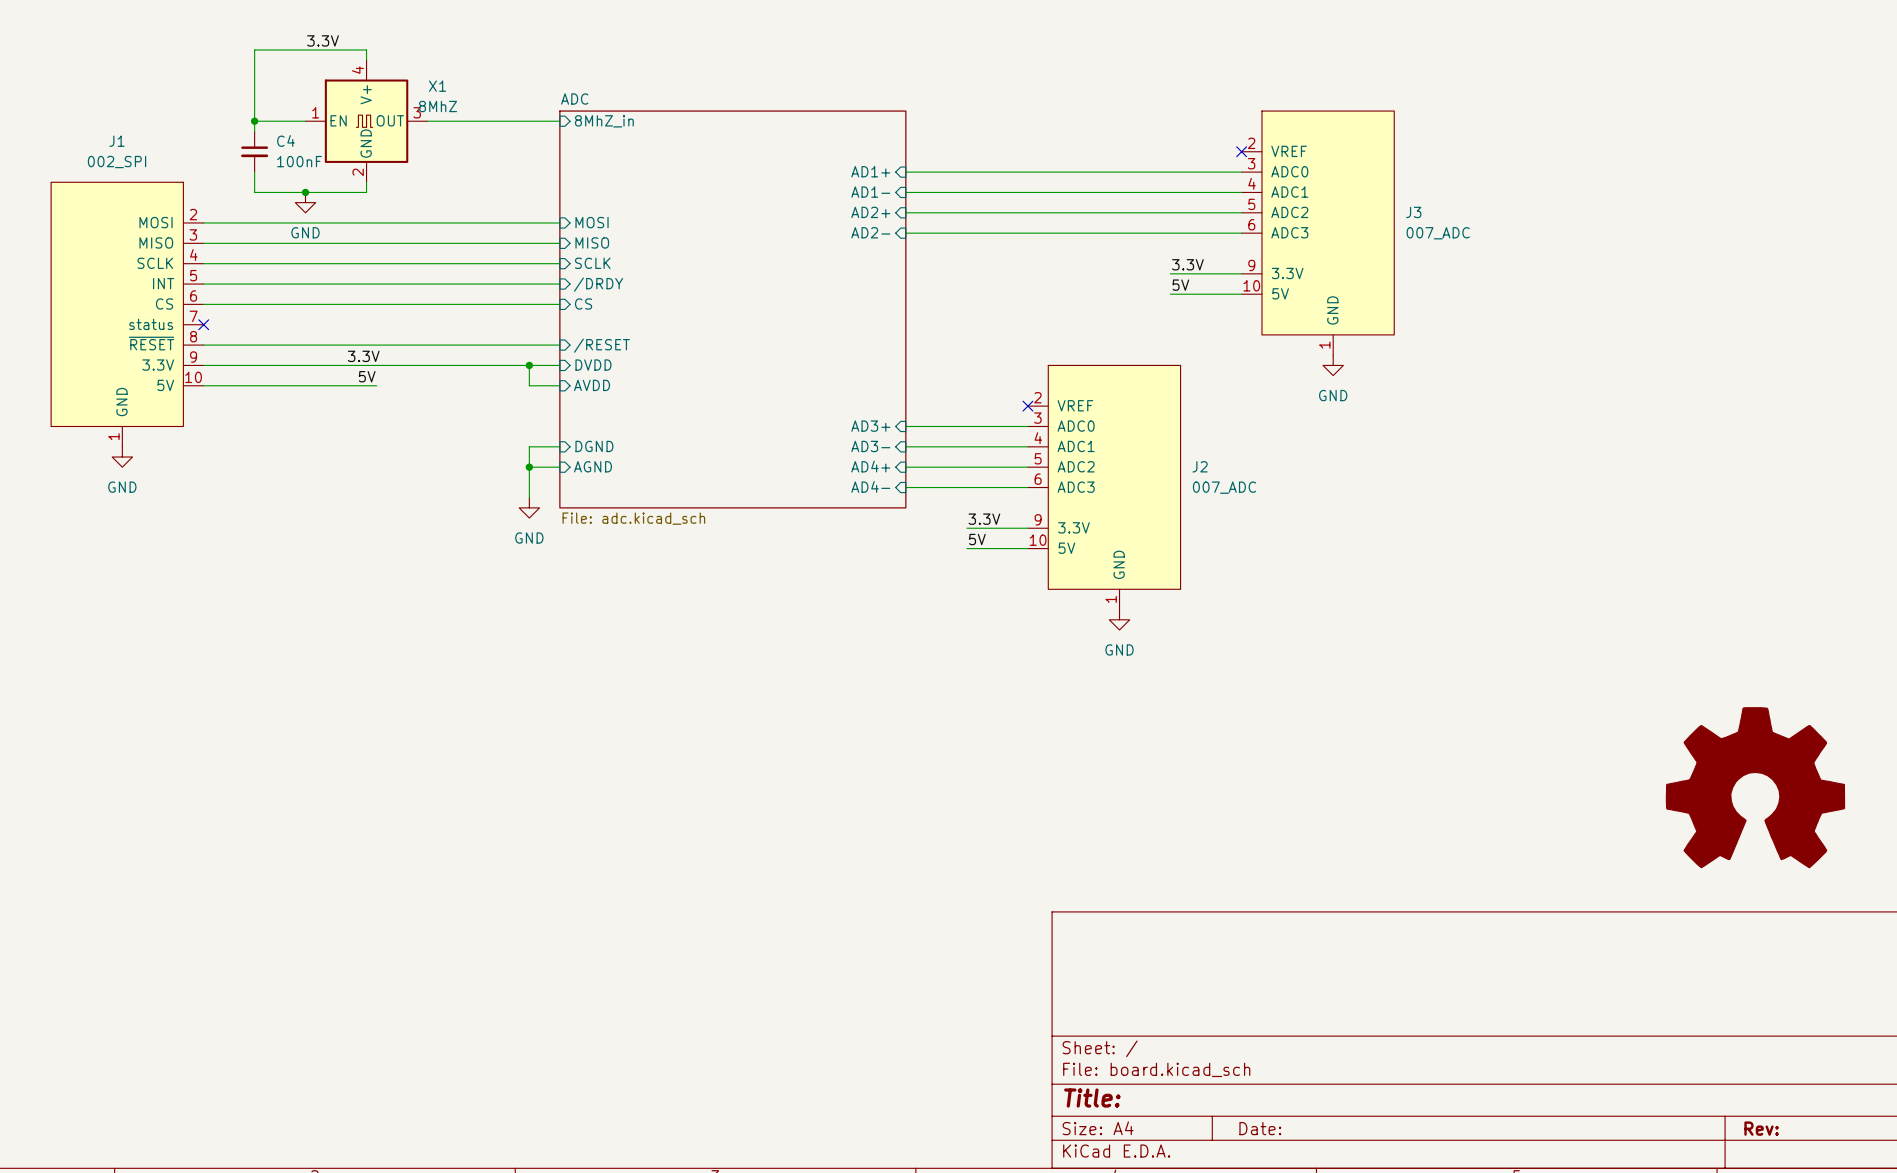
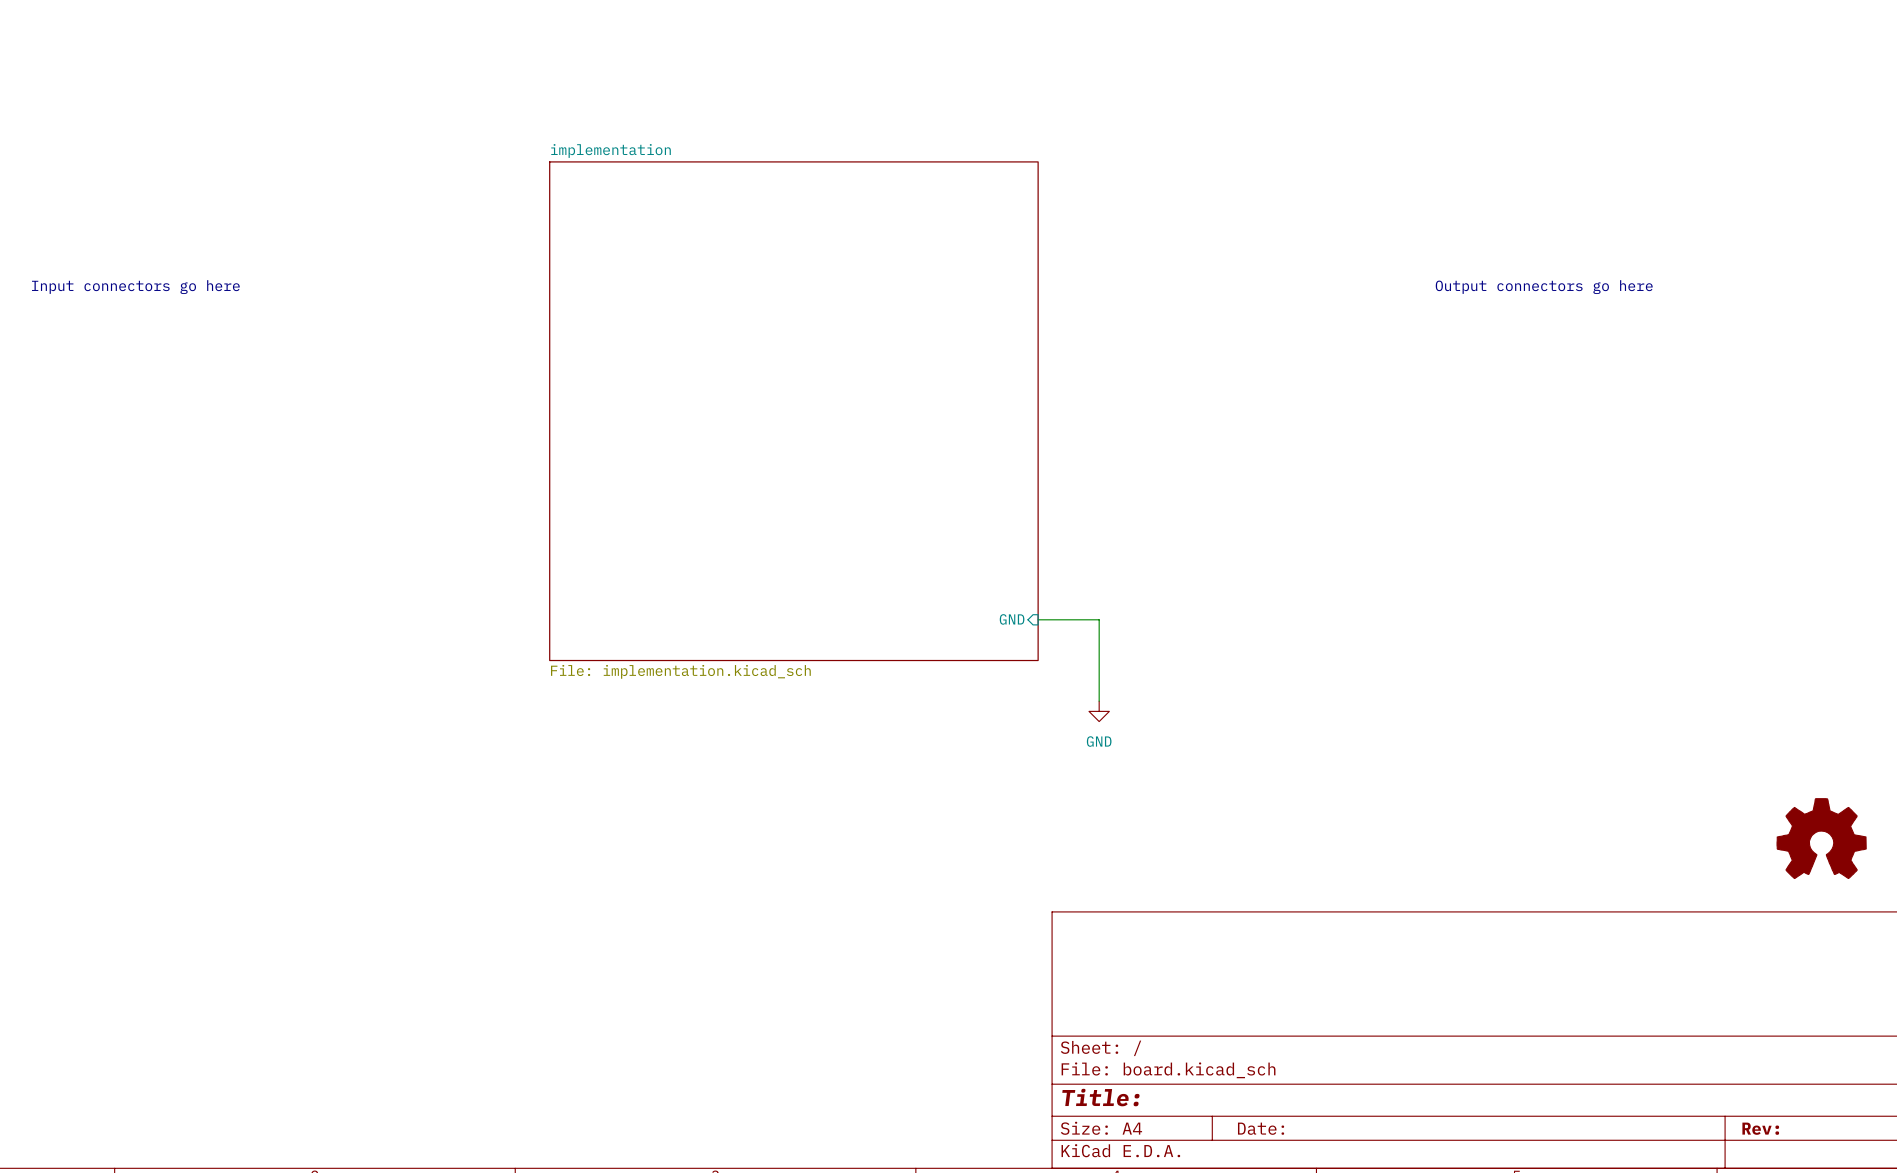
label: 3.3V (323, 40) -> none
wire: (366, 60) (366, 50) (254, 50) (254, 131) -> none
wire: (254, 121) (305, 121) -> none
junction: (254, 121) -> none
X1: 8MhZ (366, 121) -> none
wire: (427, 121) (559, 121) -> none
sheet pin: 8MhZ_in (604, 121) -> none
C4: 100nF (254, 151) -> none
no-connect mark: (1241, 151) -> none
sheet pin: AD1+ (870, 171) -> none
wire: (254, 172) (254, 192) (366, 192) (366, 182) -> none
wire: (905, 172) (1241, 172) -> none
junction: (305, 192) -> none
sheet pin: AD1- (870, 192) -> none
wire: (905, 192) (1241, 192) -> none
power symbol: GND (305, 202) -> none
sheet pin: AD2+ (870, 212) -> none
wire: (905, 212) (1241, 212) -> none
wire: (203, 222) (559, 222) -> none
sheet pin: MOSI (592, 222) -> none
sheet pin: AD2- (870, 232) -> none
wire: (905, 233) (1241, 233) -> none
J3: 007_ADC (1317, 233) -> none
sheet pin: MISO (592, 242) -> none
wire: (203, 243) (559, 243) -> none
wire: (203, 263) (559, 263) -> none
sheet pin: SCLK (592, 263) -> none
label: 3.3V (1187, 264) -> none
wire: (1170, 273) (1241, 273) -> none
wire: (203, 284) (559, 284) -> none
sheet pin: /DRDY (598, 284) -> none
label: 5V (1180, 285) -> none
text: none -> Input connectors go here (135, 287)
text: none -> Output connectors go here (1544, 287)
wire: (1170, 294) (1241, 294) -> none
wire: (203, 304) (559, 304) -> none
sheet pin: CS (583, 304) -> none
sheet ADC: File: adc.kicad_sch (732, 309) -> none
J1: 002_SPI (127, 314) -> none
no-connect mark: (203, 324) -> none
wire: (203, 345) (559, 345) -> none
sheet pin: /RESET (601, 345) -> none
label: 3.3V (363, 356) -> none
wire: (203, 365) (559, 365) -> none
wire: (529, 365) (529, 385) (559, 385) -> none
junction: (529, 365) -> none
sheet pin: DVDD (593, 365) -> none
power symbol: GND (1333, 365) -> none
label: 5V (367, 376) -> none
wire: (203, 385) (376, 385) -> none
sheet pin: AVDD (592, 385) -> none
no-connect mark: (1027, 406) -> none
sheet implementation: none -> File: implementation.kicad_sch (793, 411)
sheet pin: AD3+ (870, 426) -> none
wire: (905, 426) (1027, 426) -> none
wire: (559, 446) (529, 446) (529, 497) -> none
sheet pin: DGND (594, 446) -> none
sheet pin: AD3- (870, 446) -> none
wire: (905, 446) (1027, 446) -> none
power symbol: GND (122, 457) -> none
sheet pin: AGND (592, 466) -> none
sheet pin: AD4+ (870, 466) -> none
wire: (529, 467) (559, 467) -> none
junction: (529, 467) -> none
wire: (905, 467) (1027, 467) -> none
sheet pin: AD4- (870, 486) -> none
wire: (905, 487) (1027, 487) -> none
J2: 007_ADC (1104, 487) -> none
power symbol: GND (529, 507) -> none
label: 3.3V (984, 519) -> none
wire: (966, 528) (1027, 528) -> none
label: 5V (977, 539) -> none
wire: (966, 548) (1027, 548) -> none
sheet pin: none -> GND (1012, 619)
wire: none -> (1038, 619) (1099, 619) (1099, 701)
power symbol position: GND (1119, 619) -> GND (1099, 711)
part: (1755, 787) -> none
part: none -> (1821, 838)

